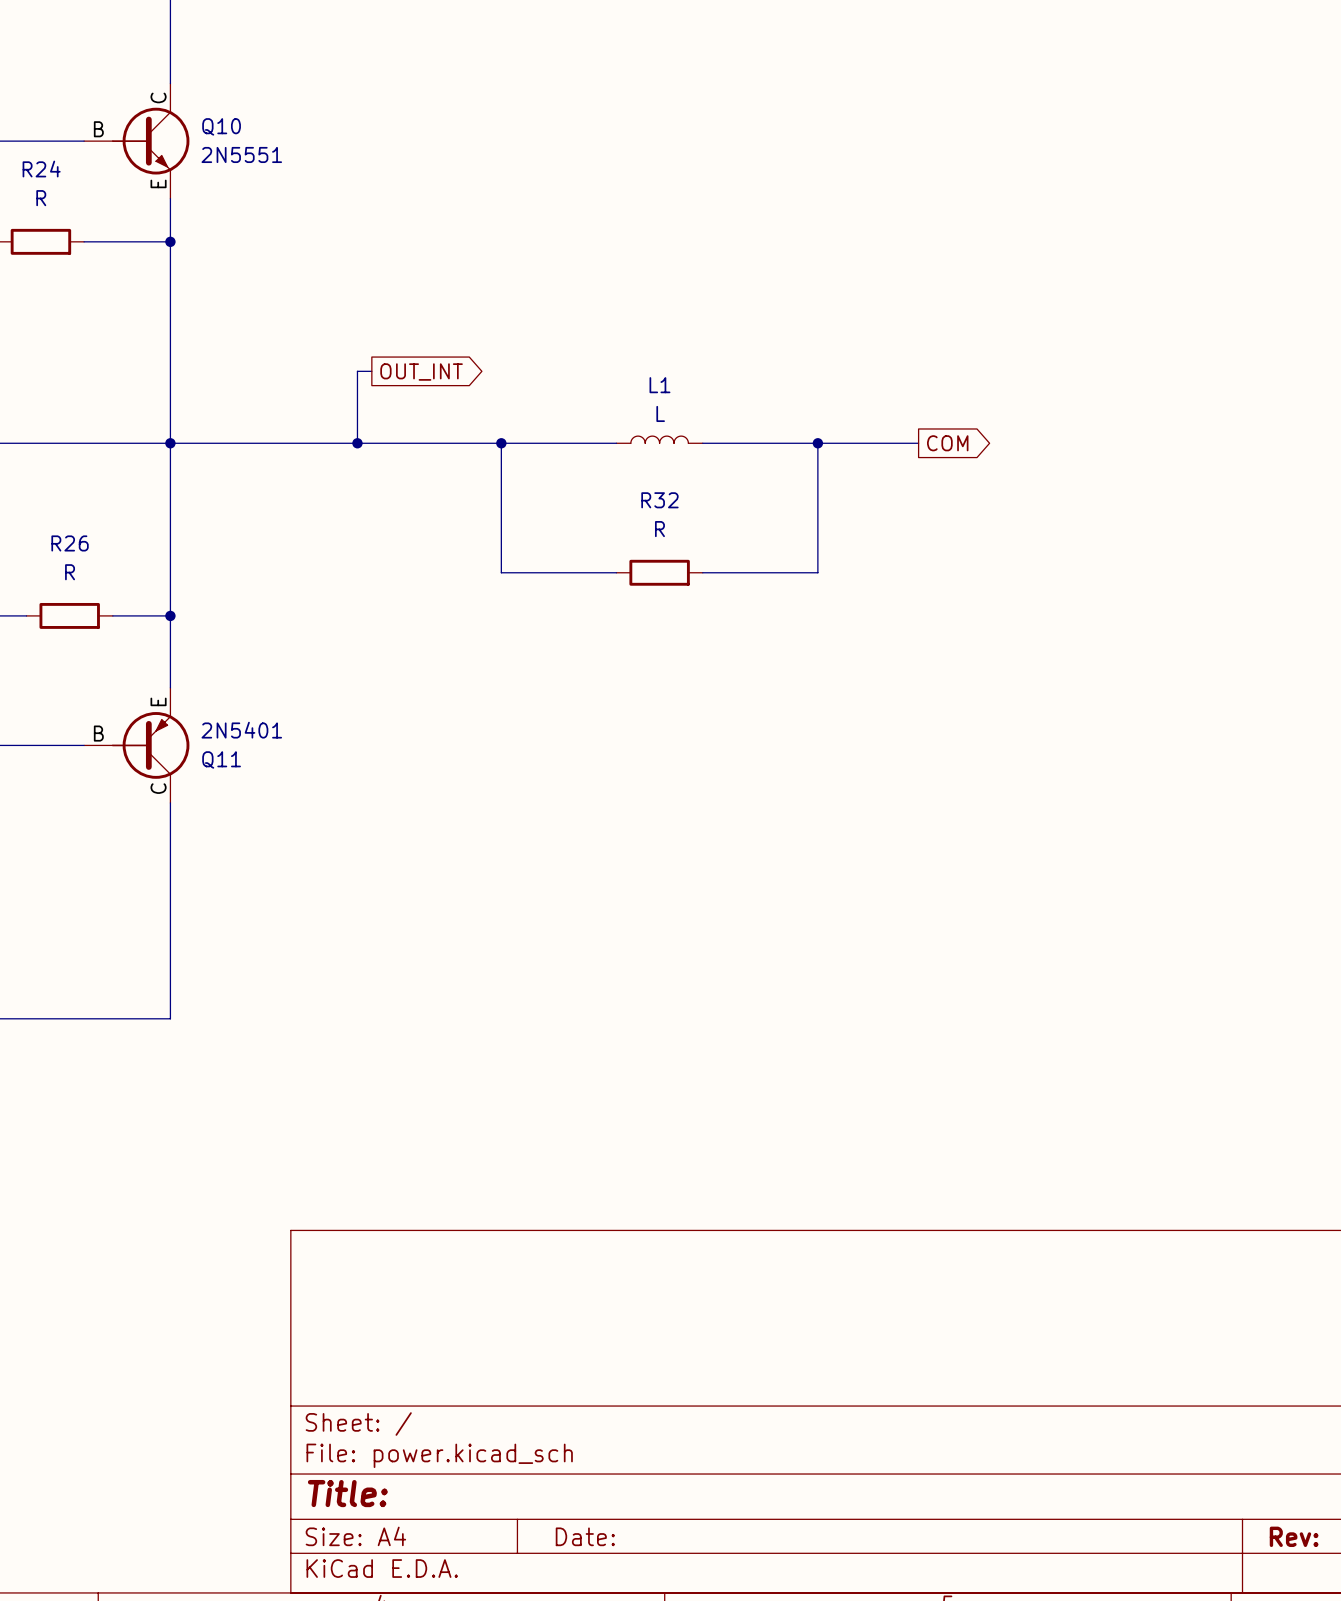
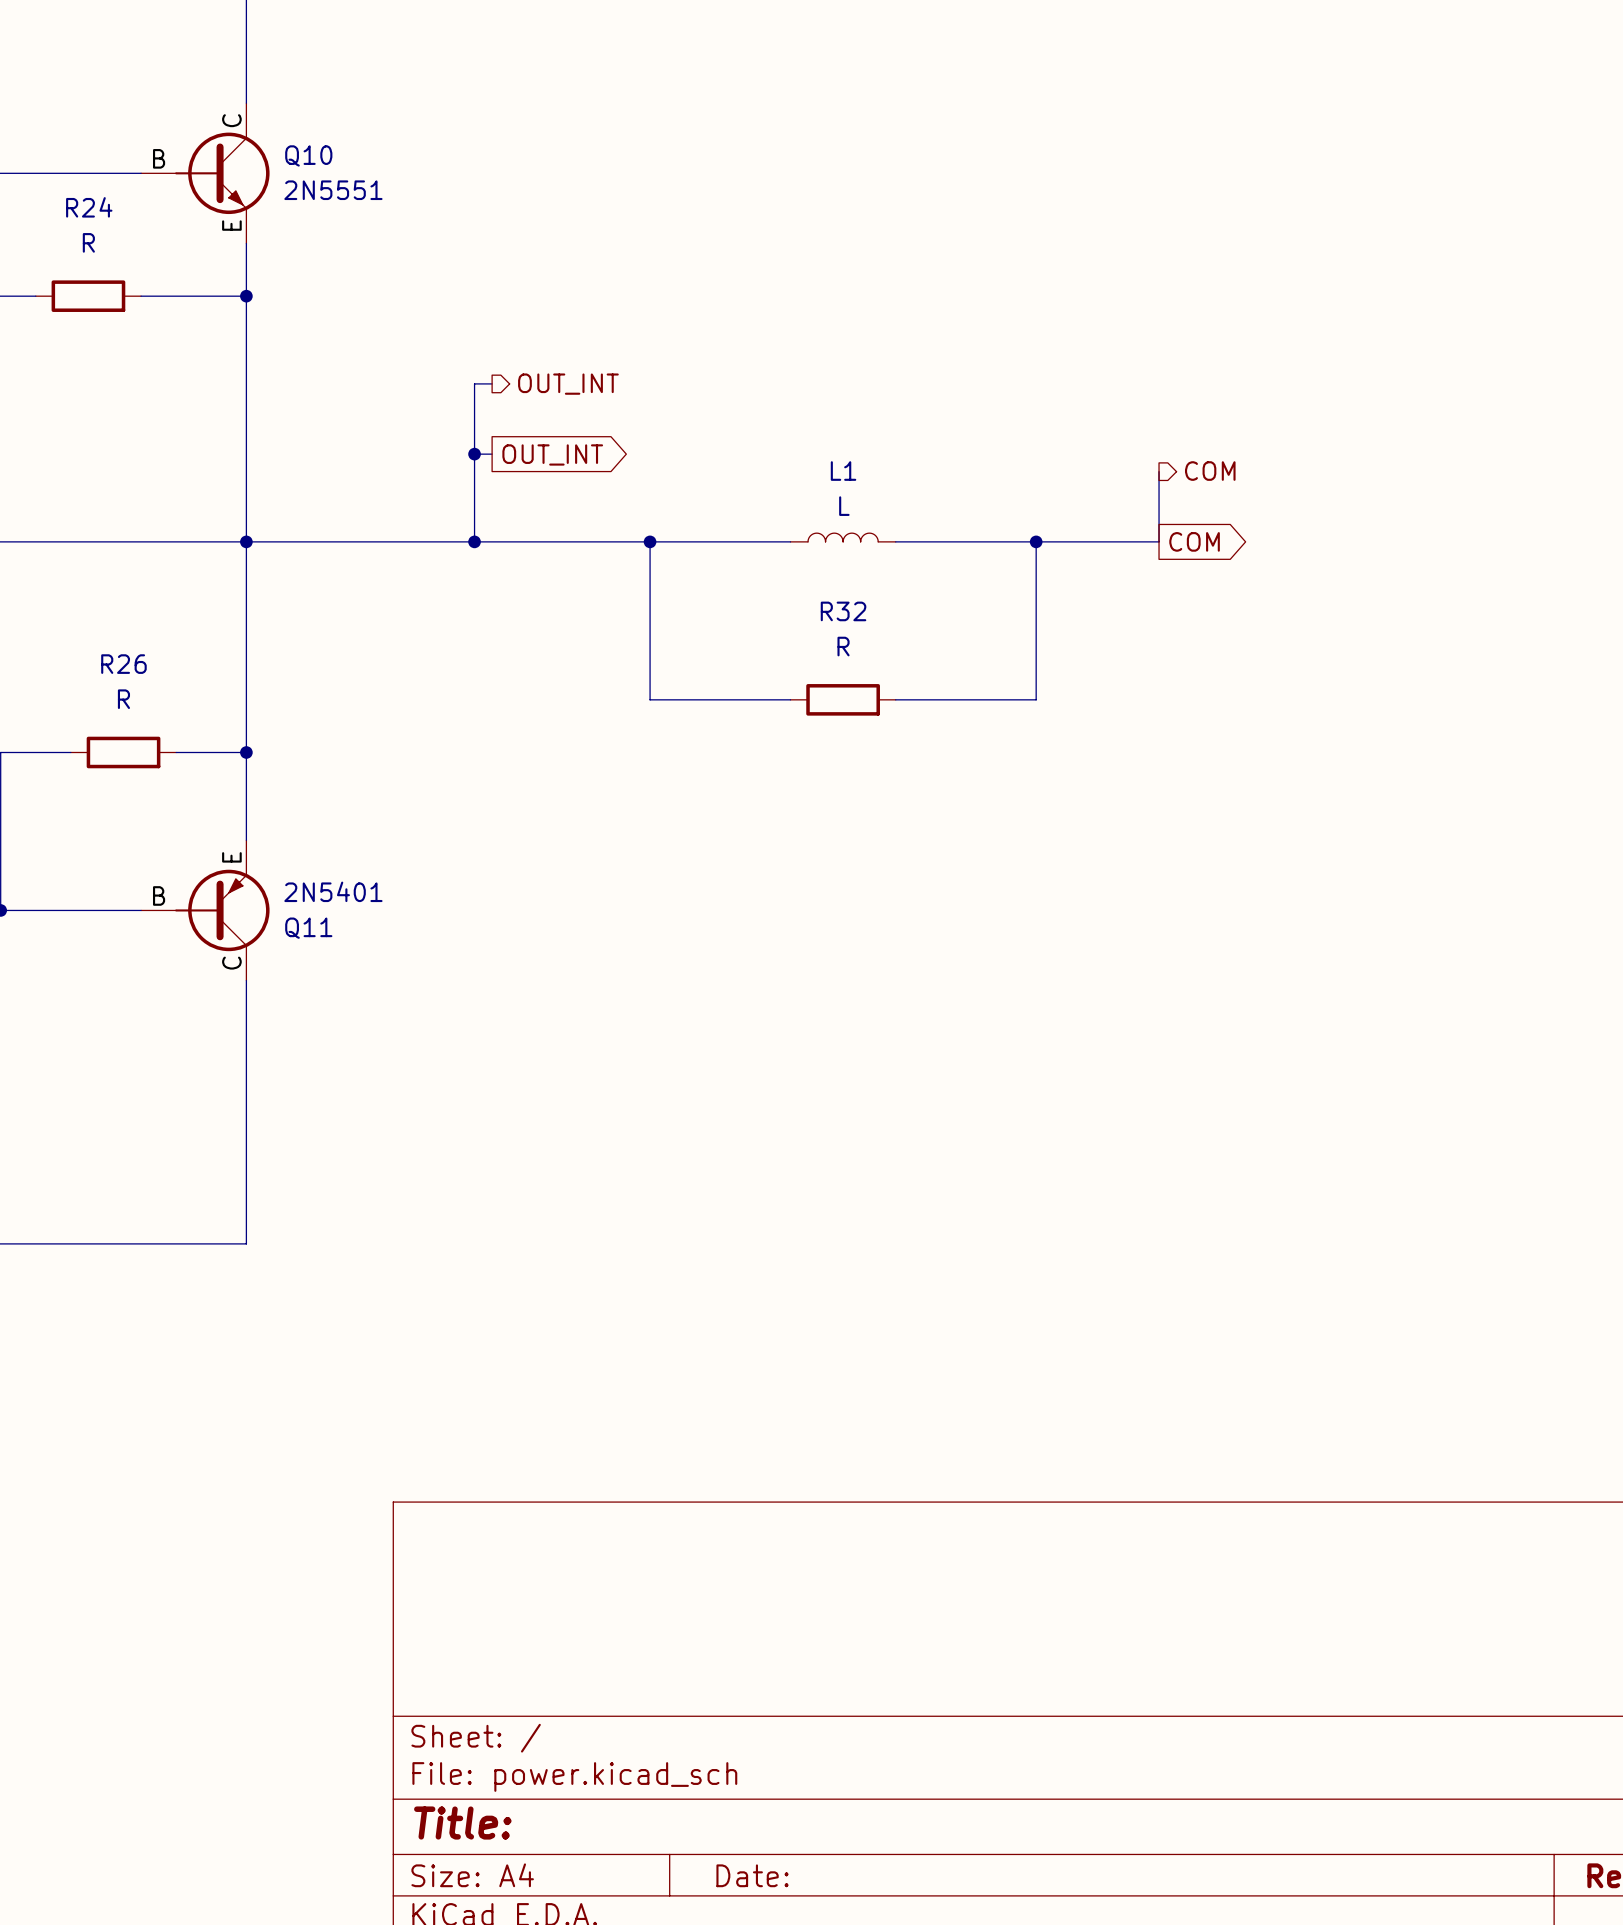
wire: none -> (492, 383) (474, 383) (474, 454)
hierarchical label: none -> OUT_INT (568, 384)
junction: none -> (474, 454)
wire: none -> (1159, 471) (1159, 541)
hierarchical label: none -> COM (1210, 471)

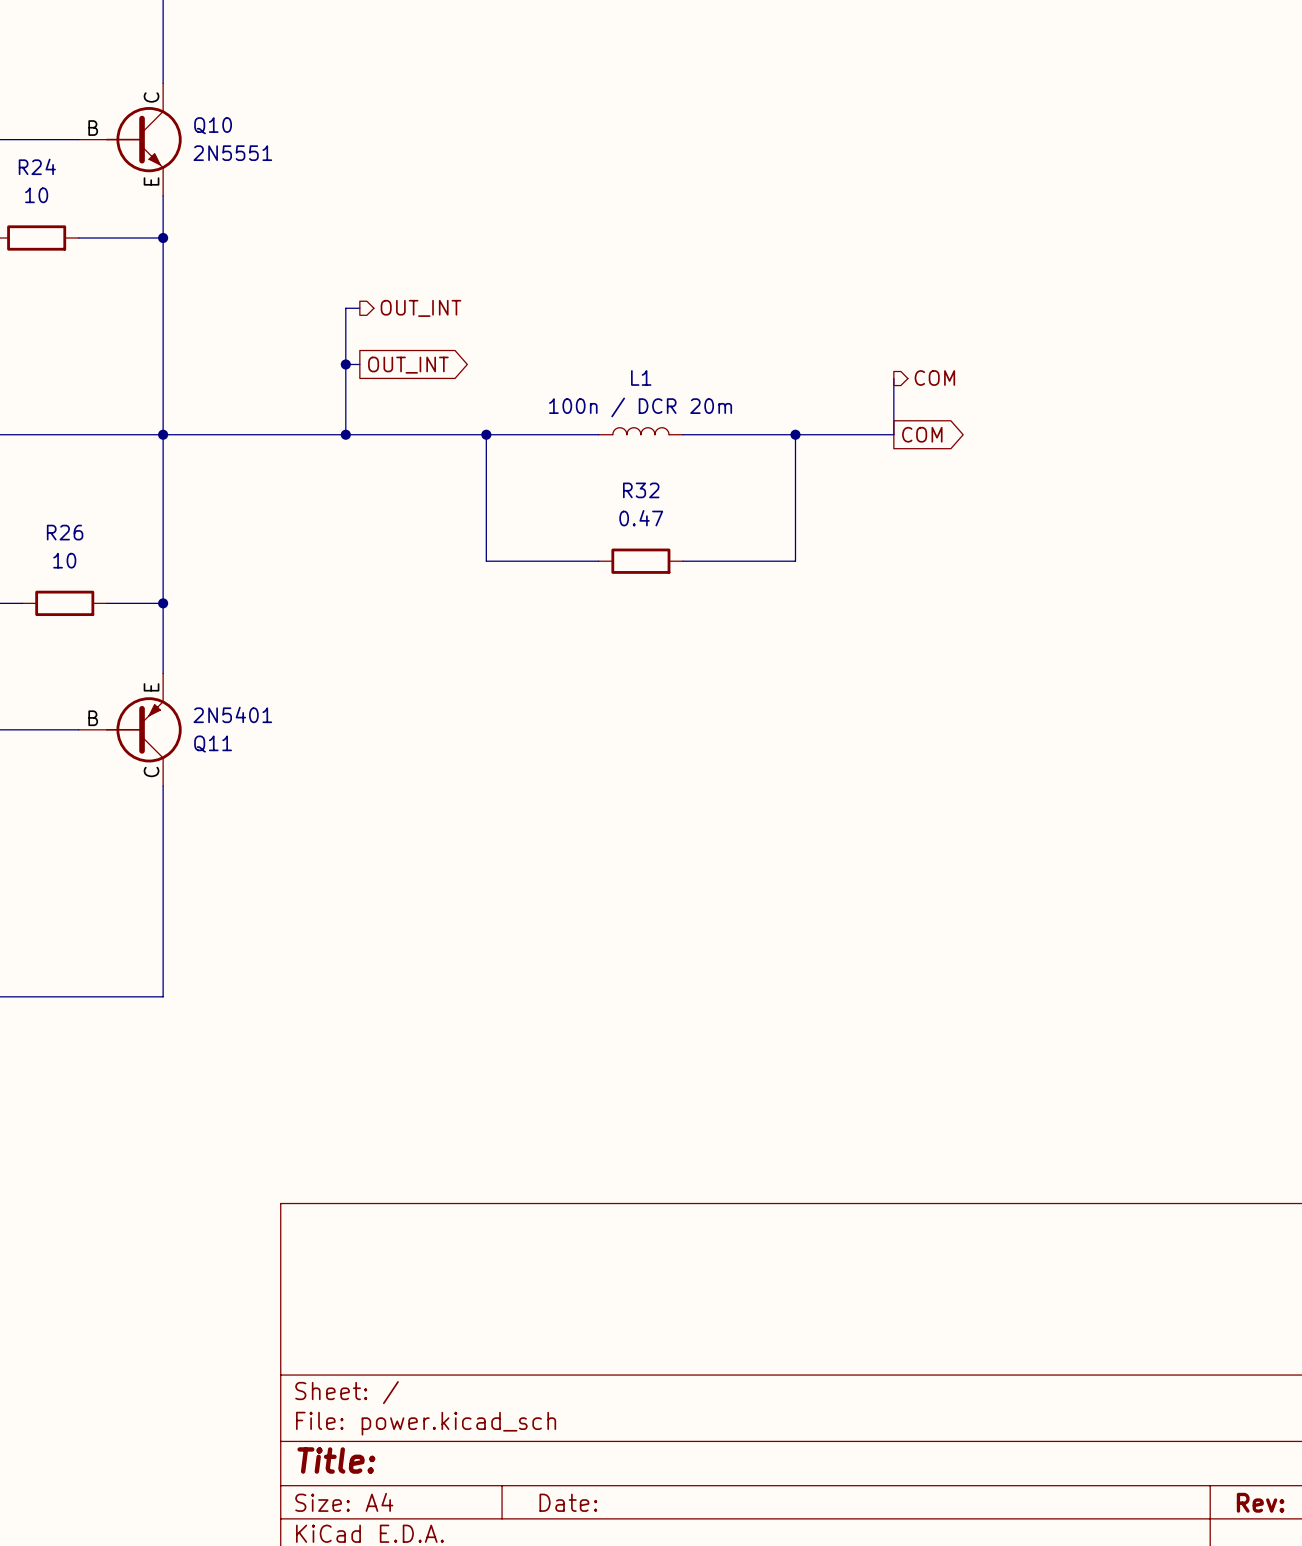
R24 value: R (88, 242) -> 10 (36, 195)
L1 value: L (844, 506) -> 100n / DCR 20m (640, 407)
R32 value: R (843, 646) -> 0.47 (641, 518)
R26 value: R (123, 699) -> 10 (64, 560)

